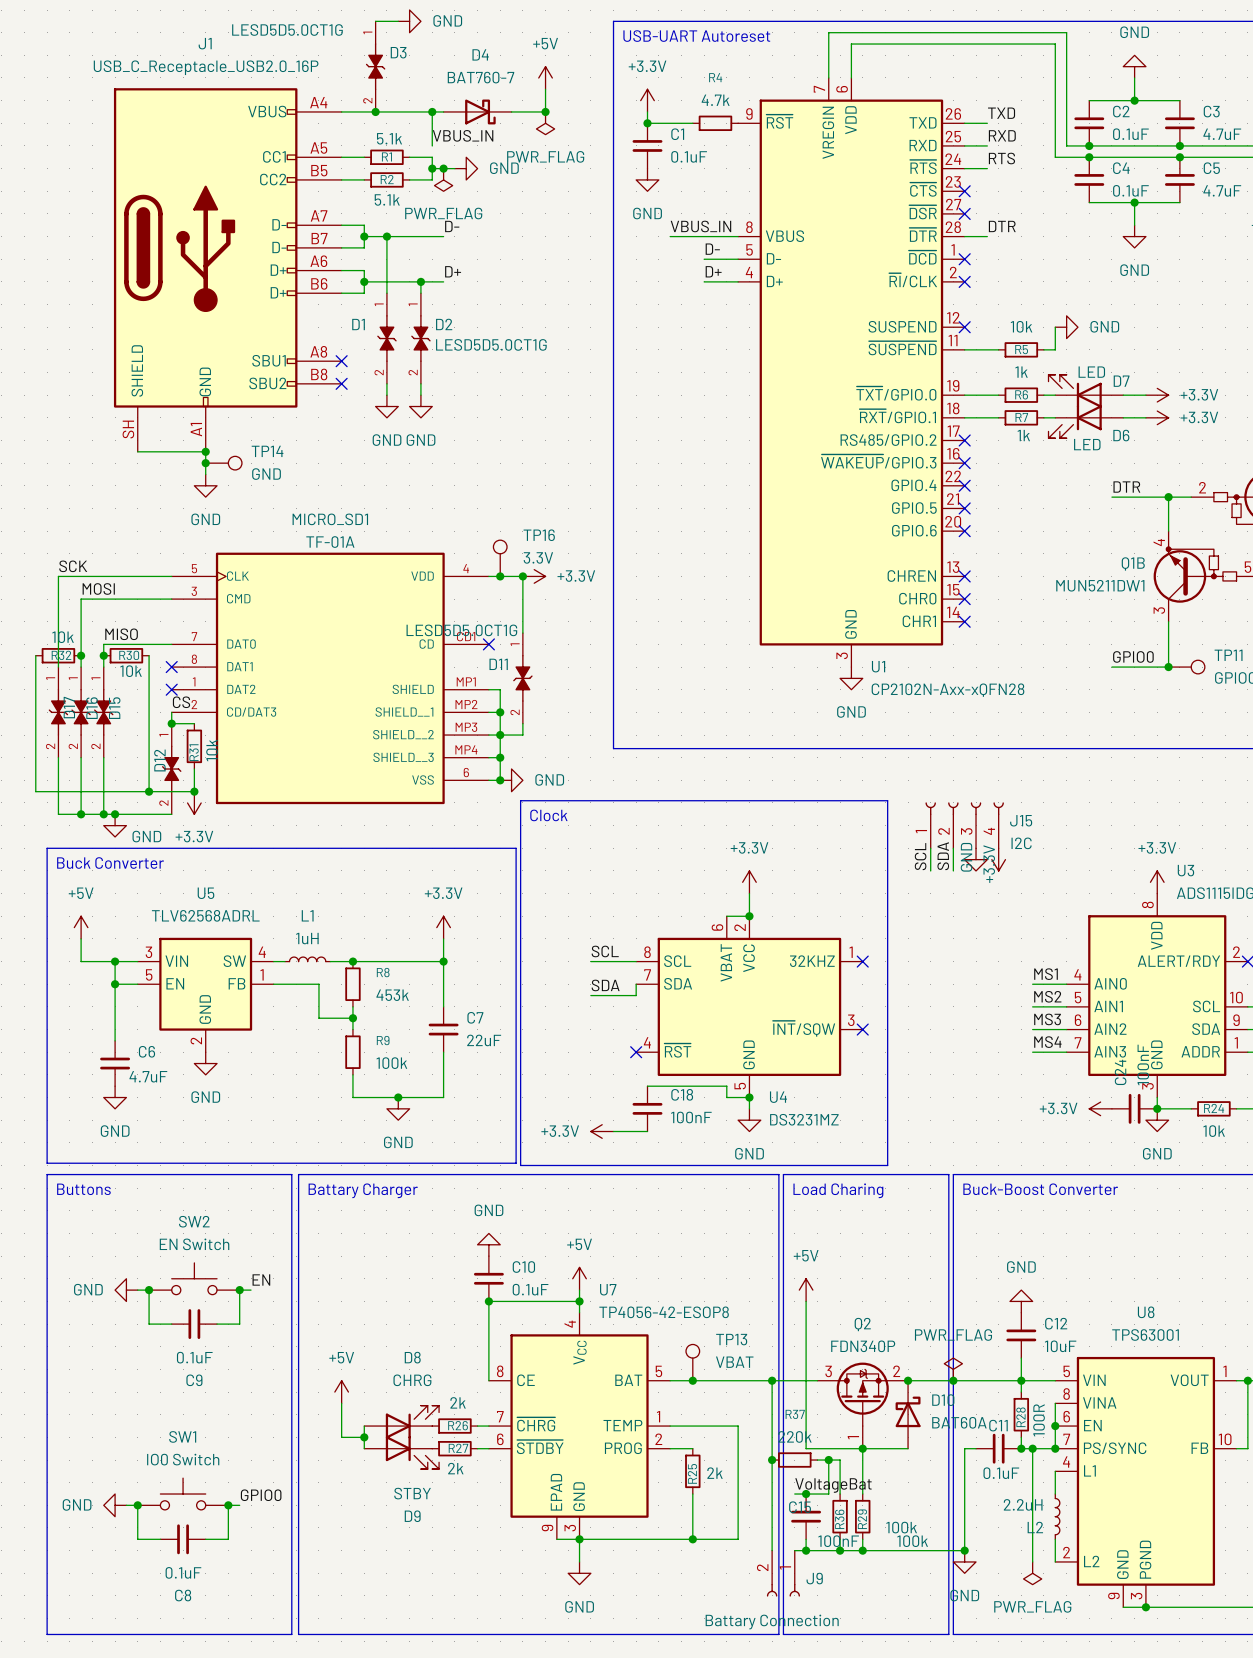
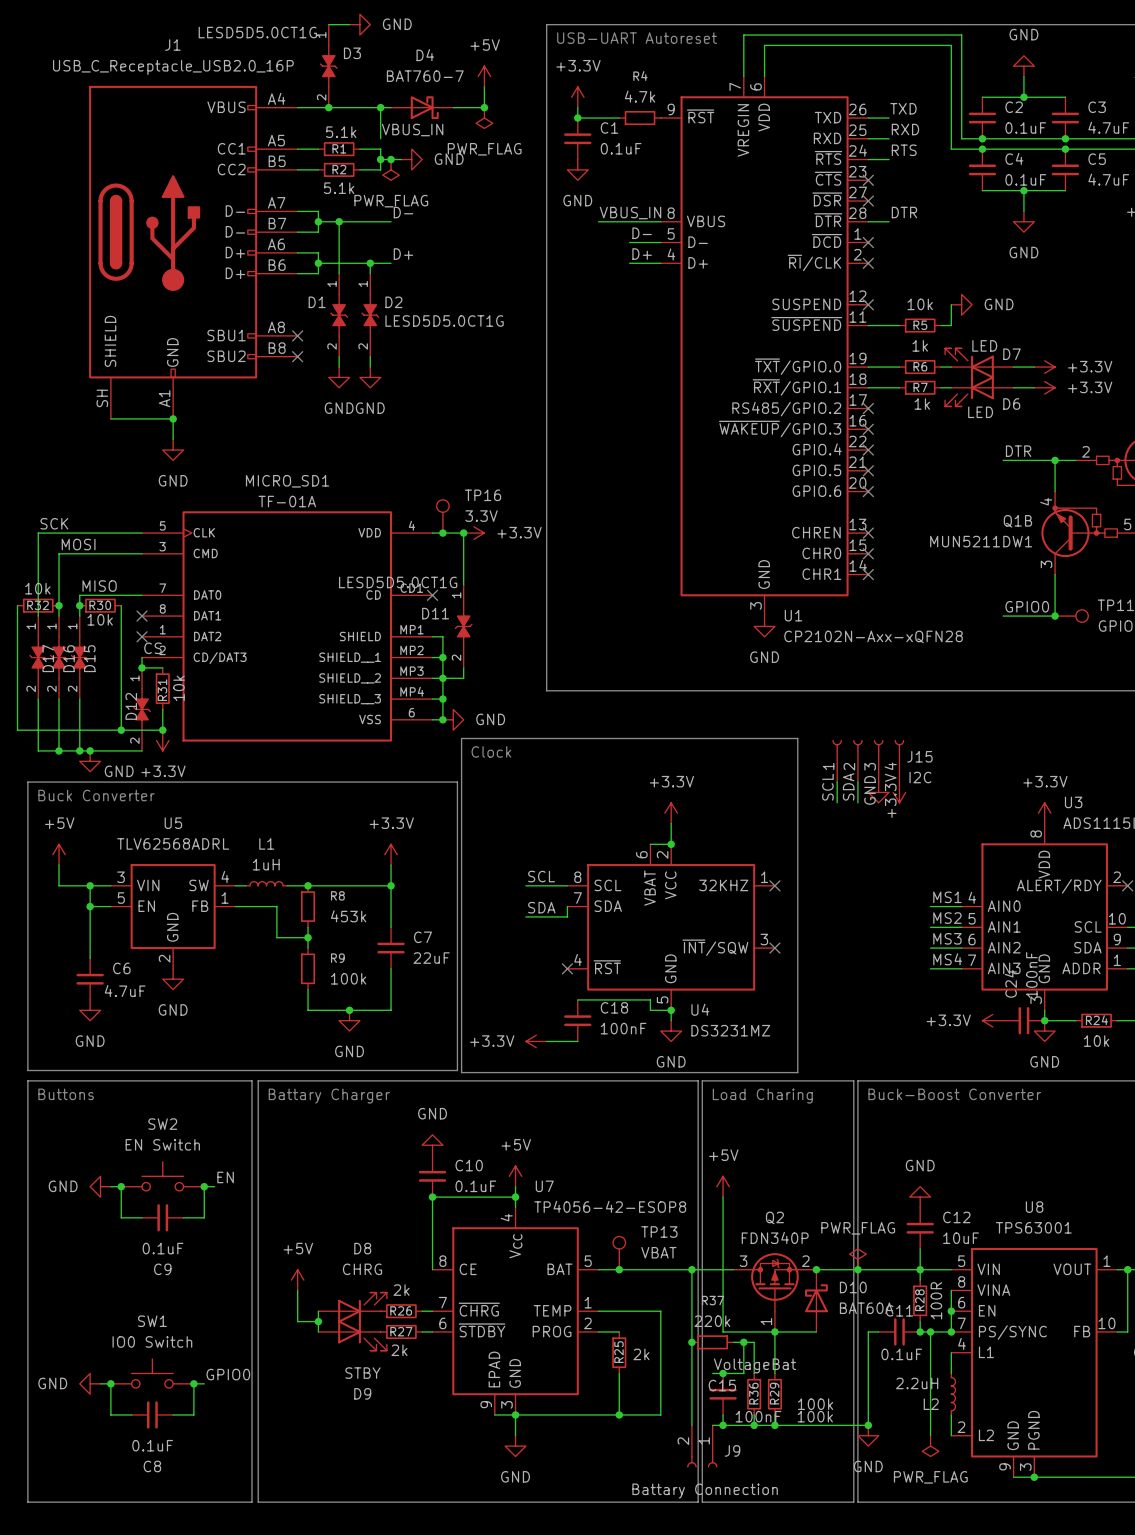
junction: (205, 463) -> none
TP14: GND (223, 463) -> none

